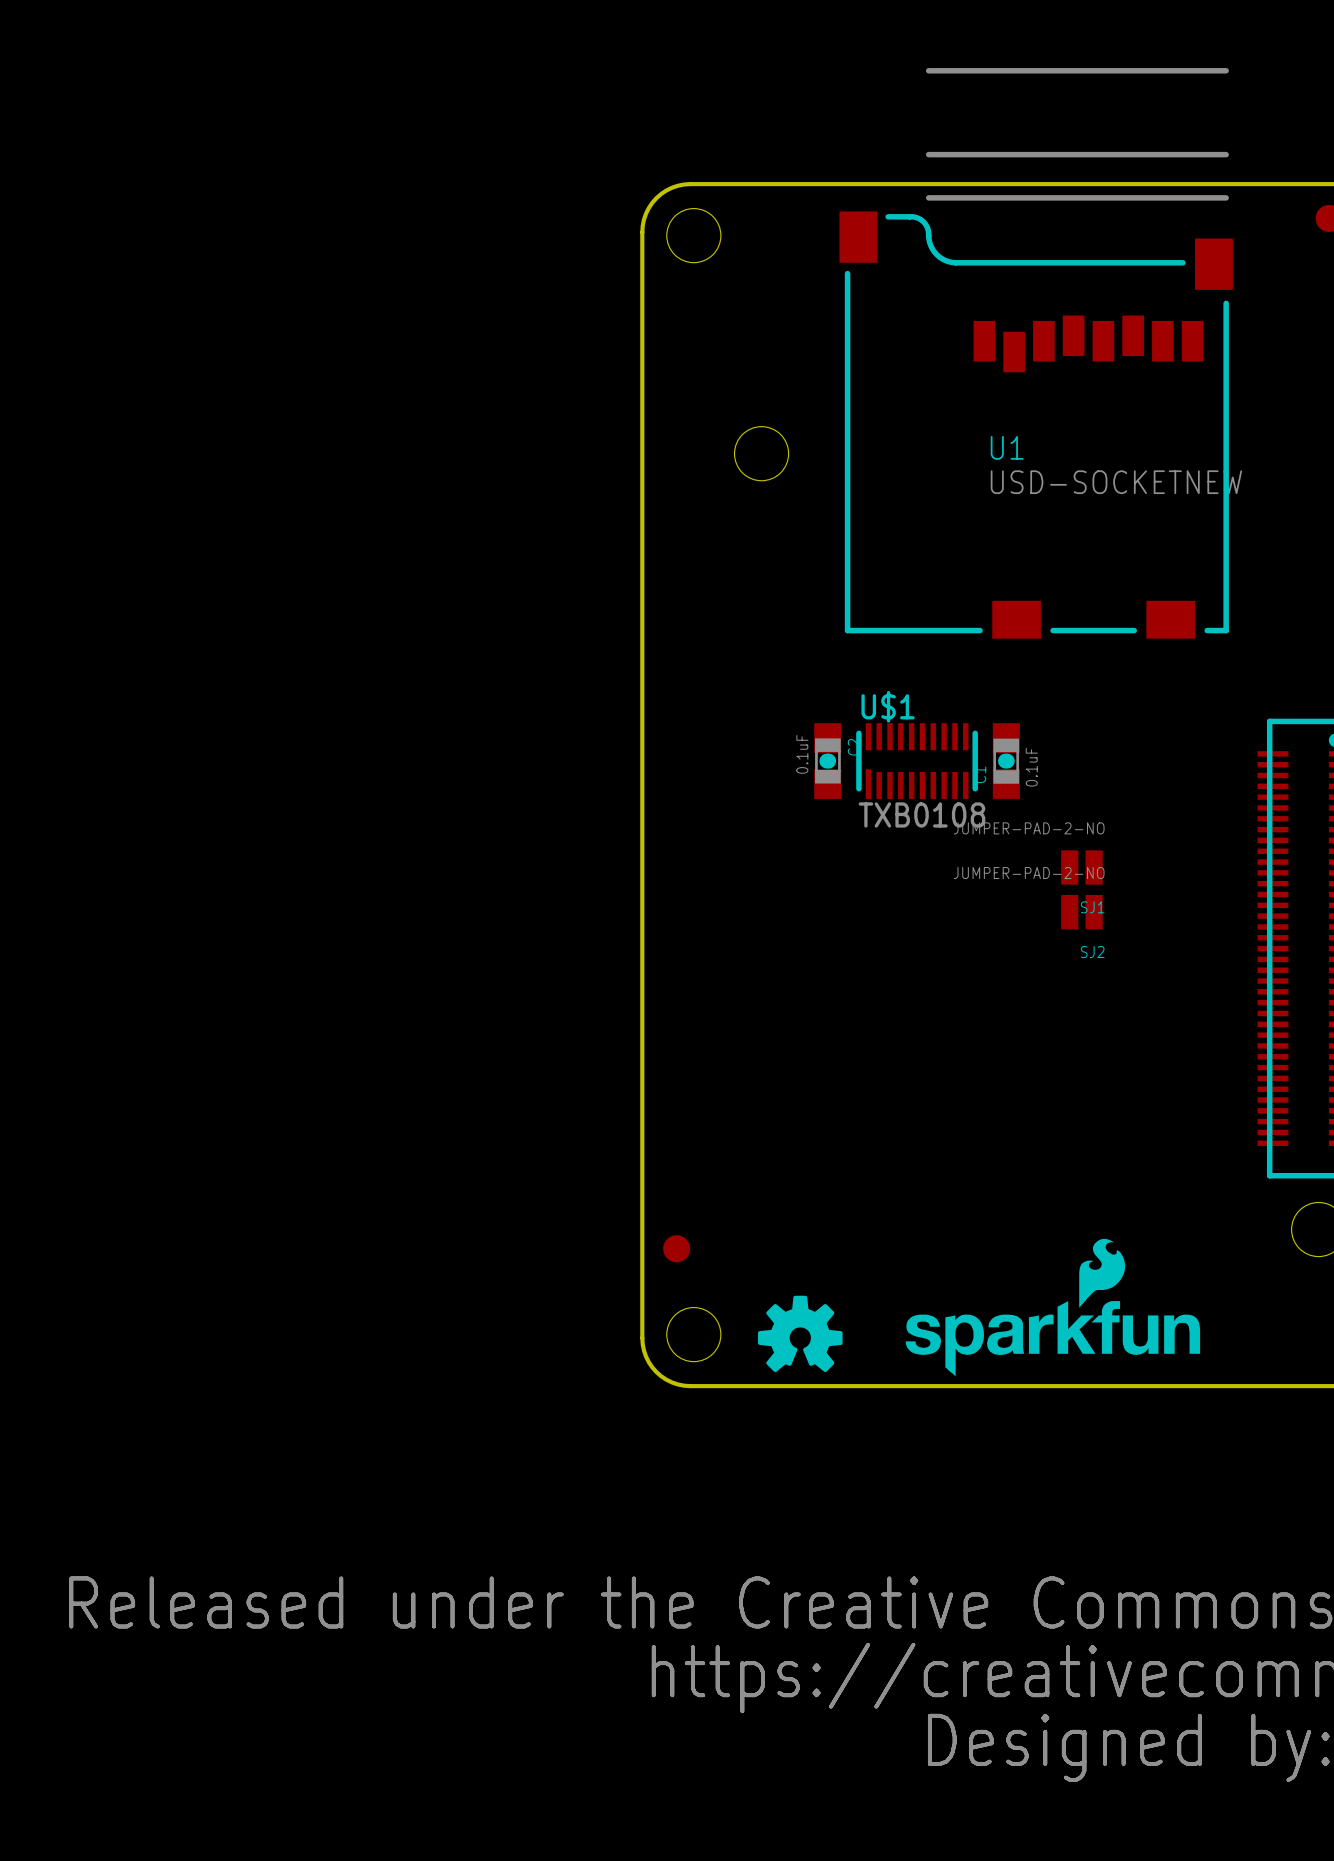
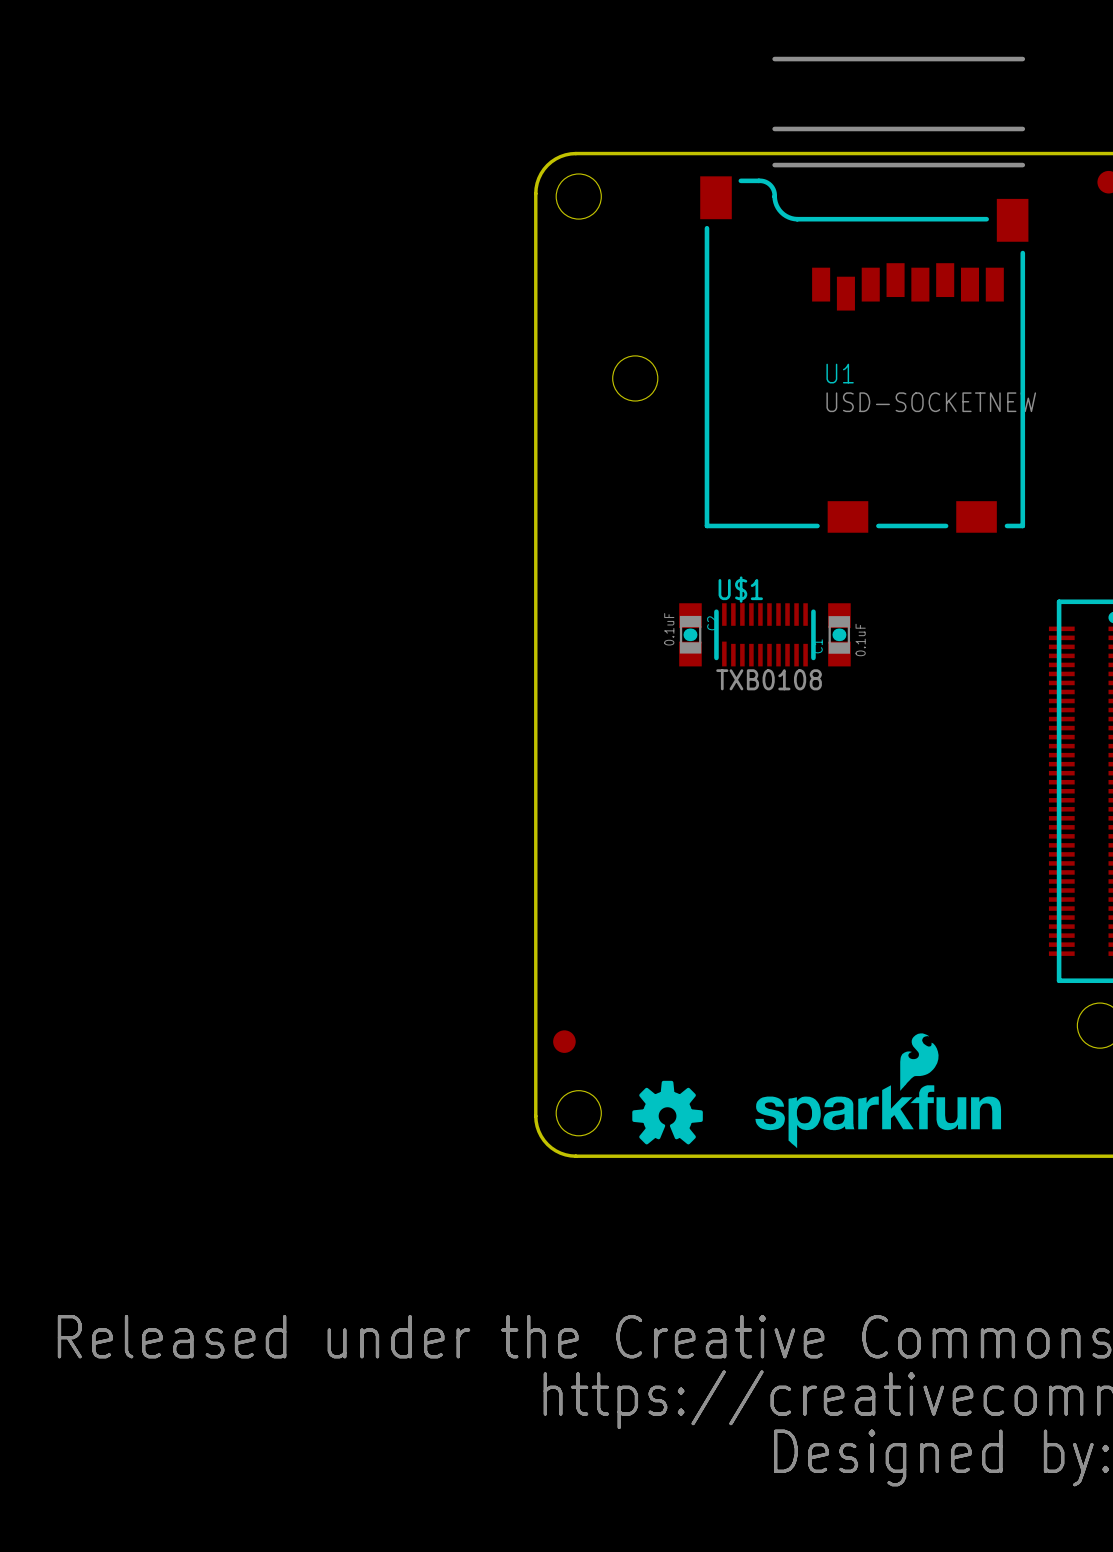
SJ1: JUMPER-PAD-2-NO (1081, 867) -> none
SJ2: JUMPER-PAD-2-NO (1081, 912) -> none

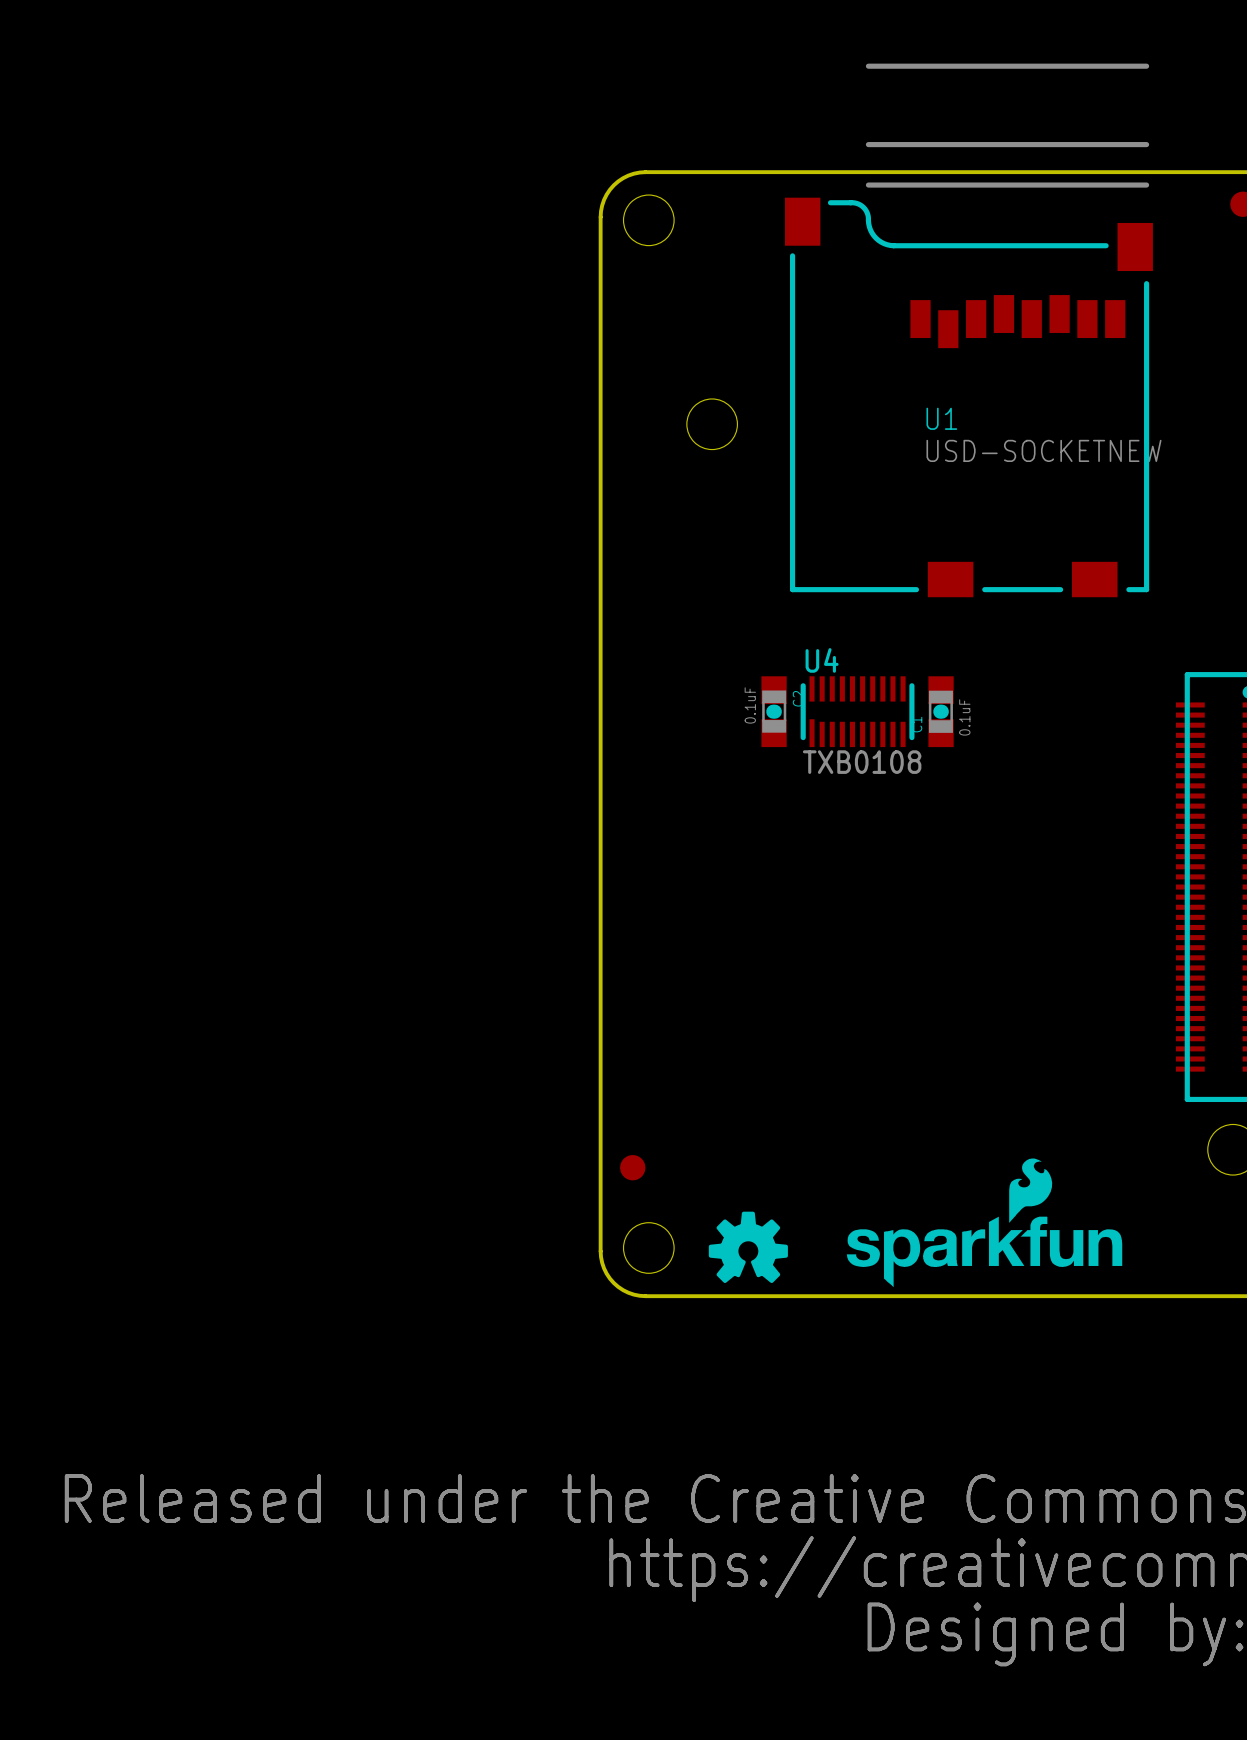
U$1 name: U$1 (740, 589) -> U4 (822, 660)

